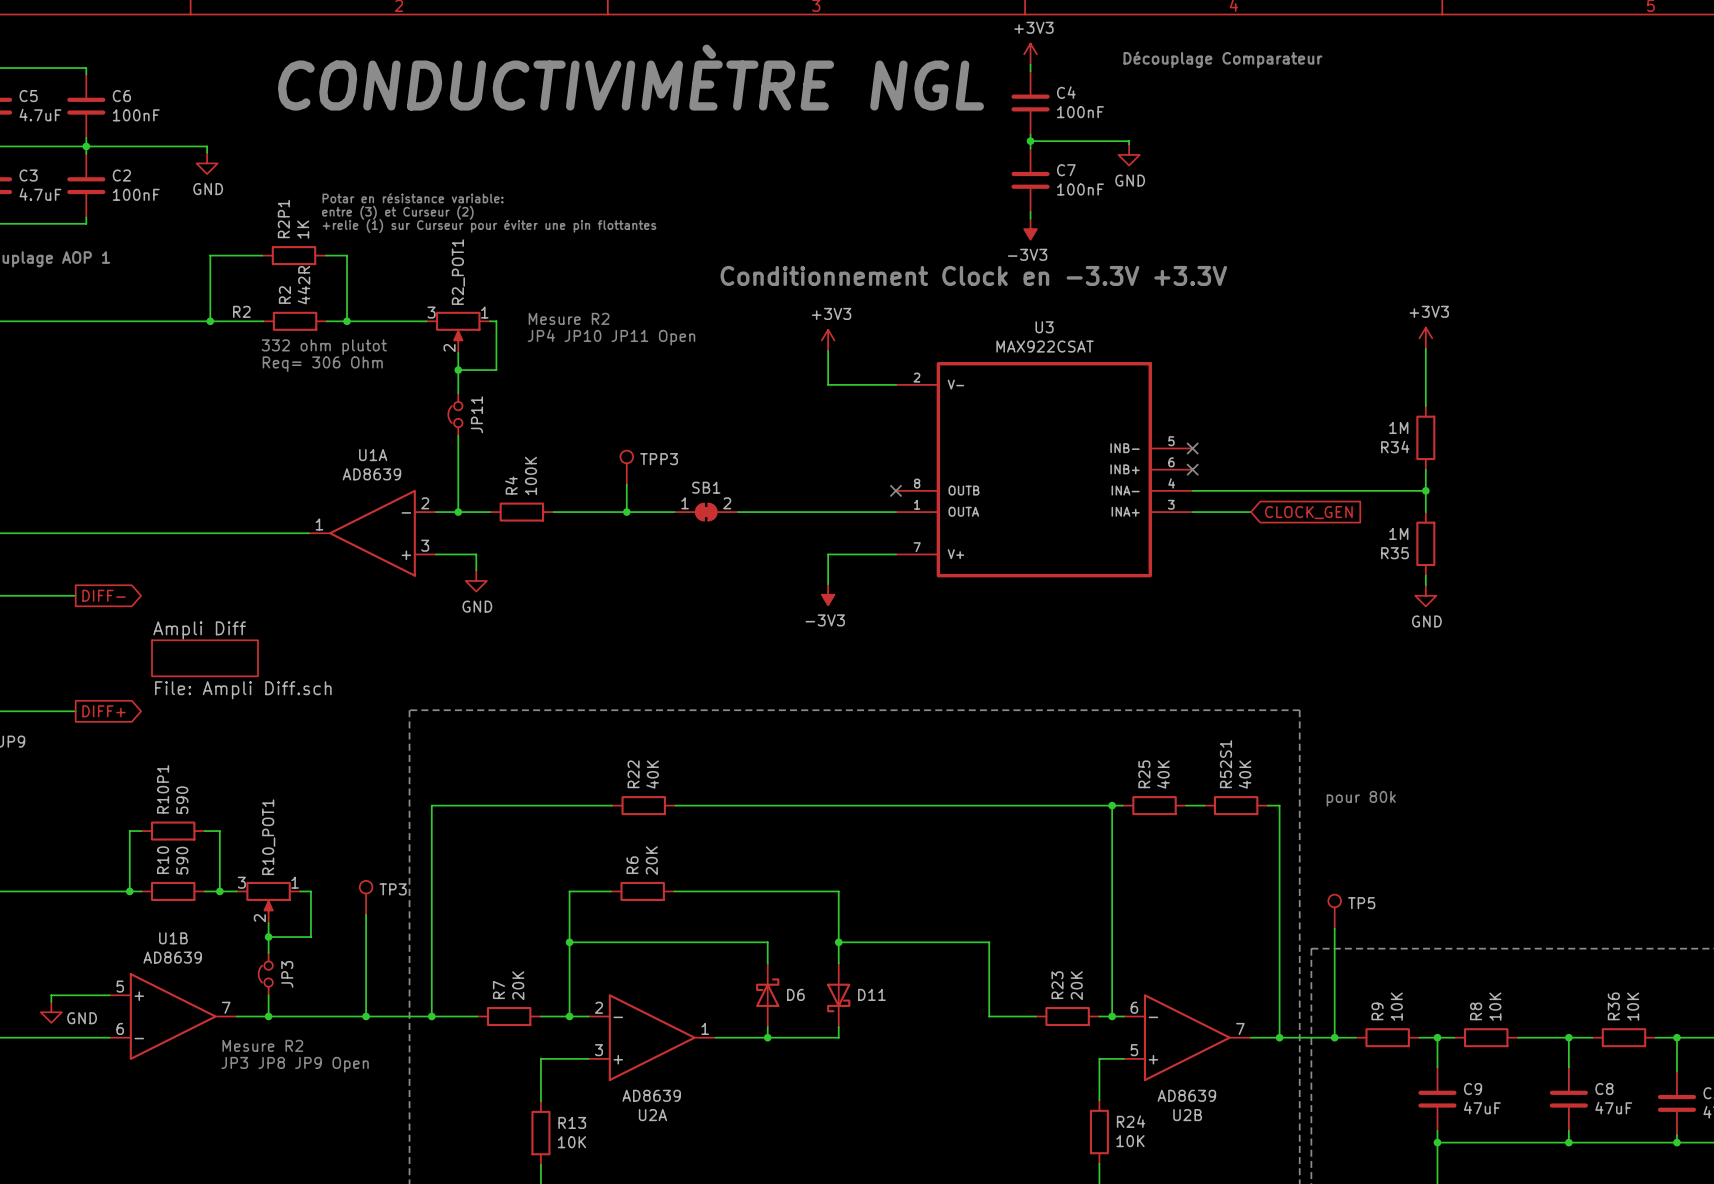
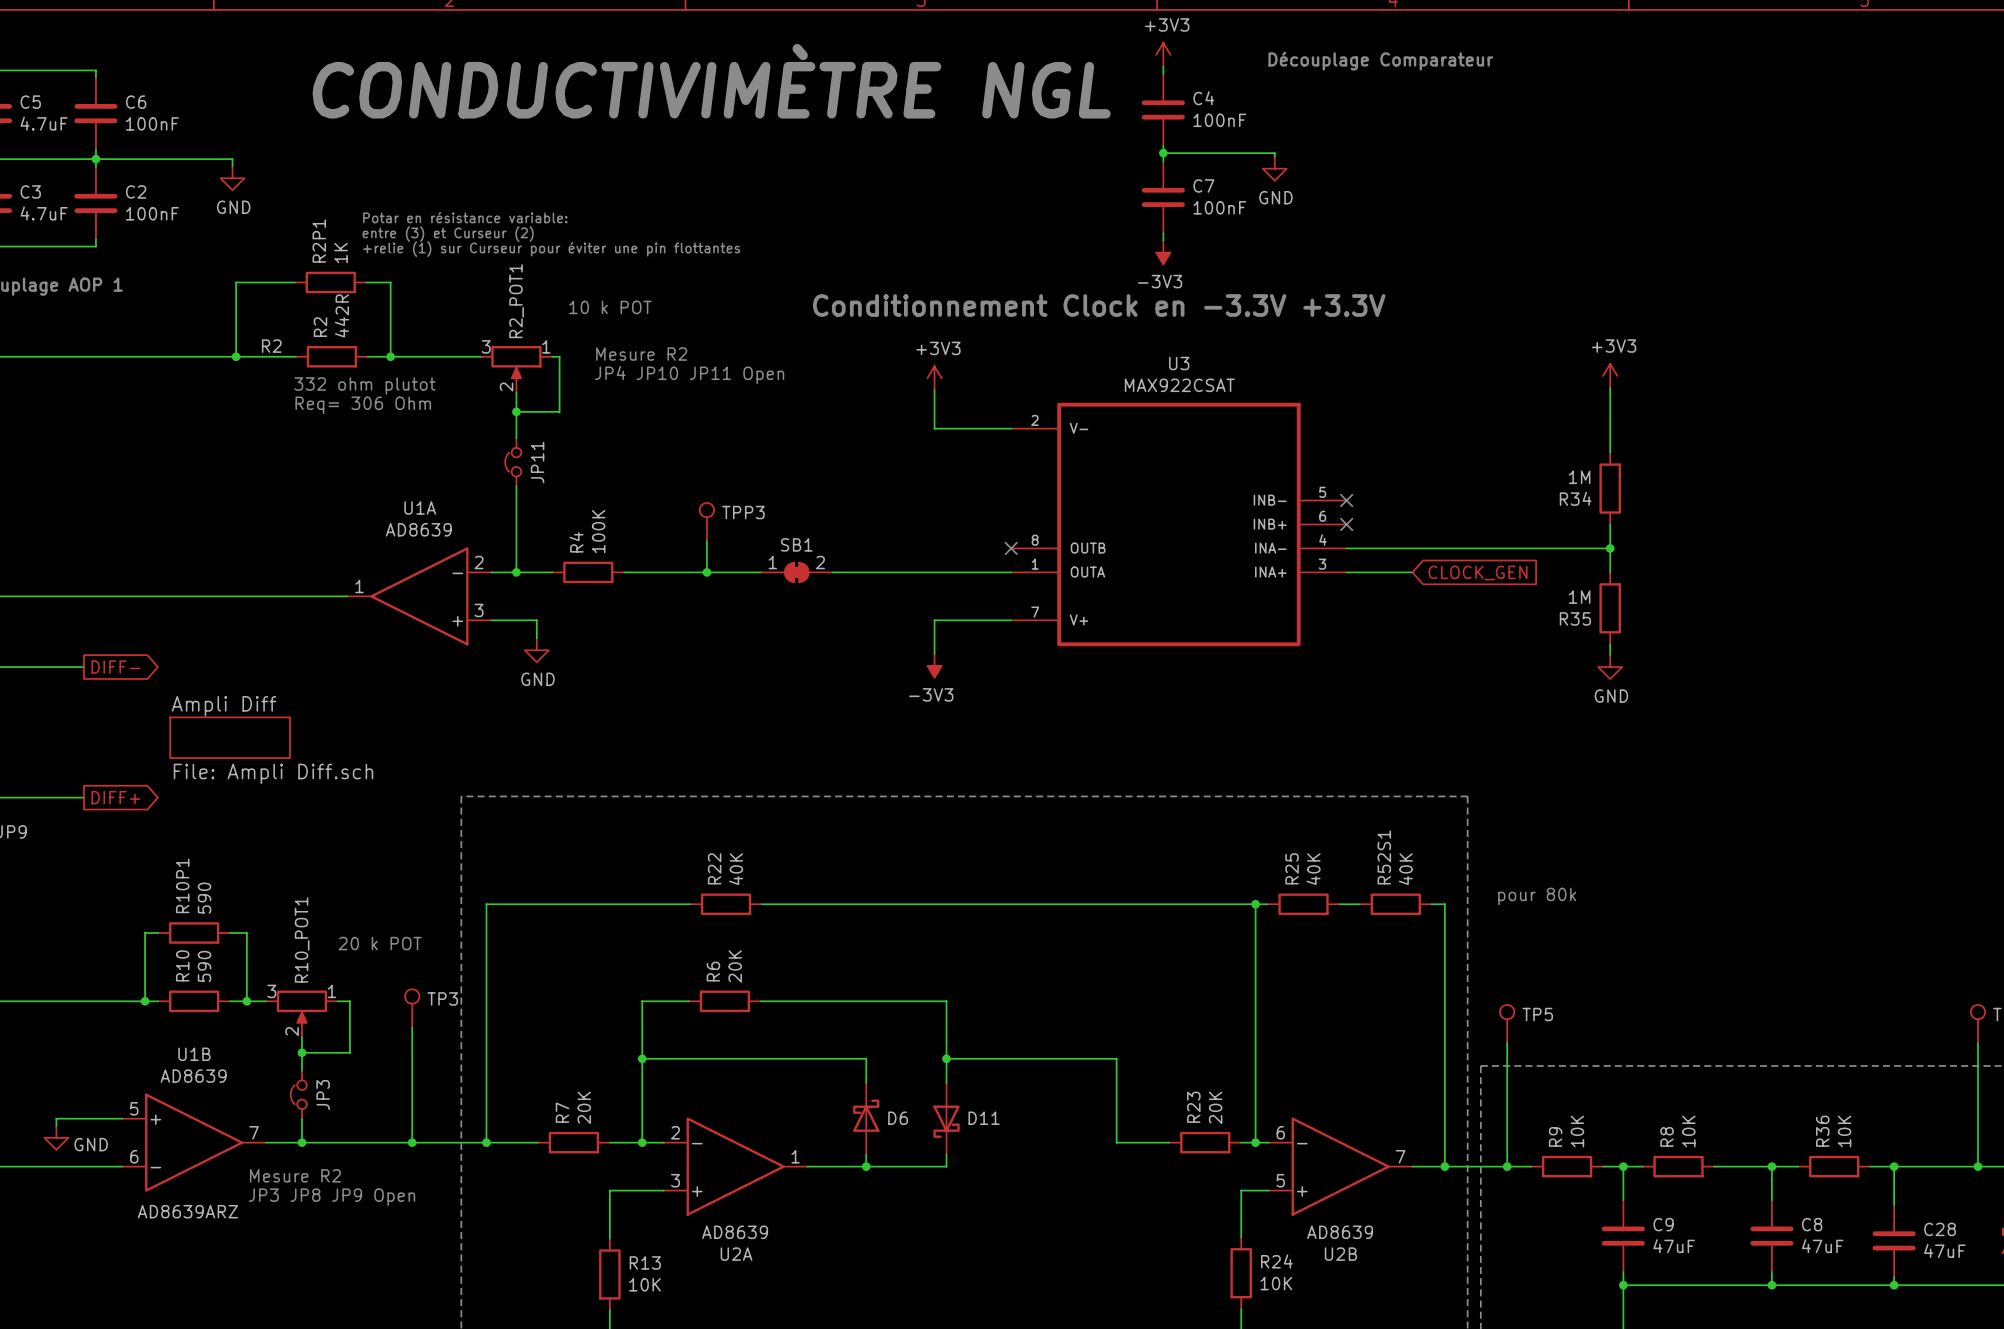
text: none -> 10 k POT (610, 307)
text: none -> 20 k POT (380, 943)
U1B text: none -> AD8639ARZ (187, 1211)

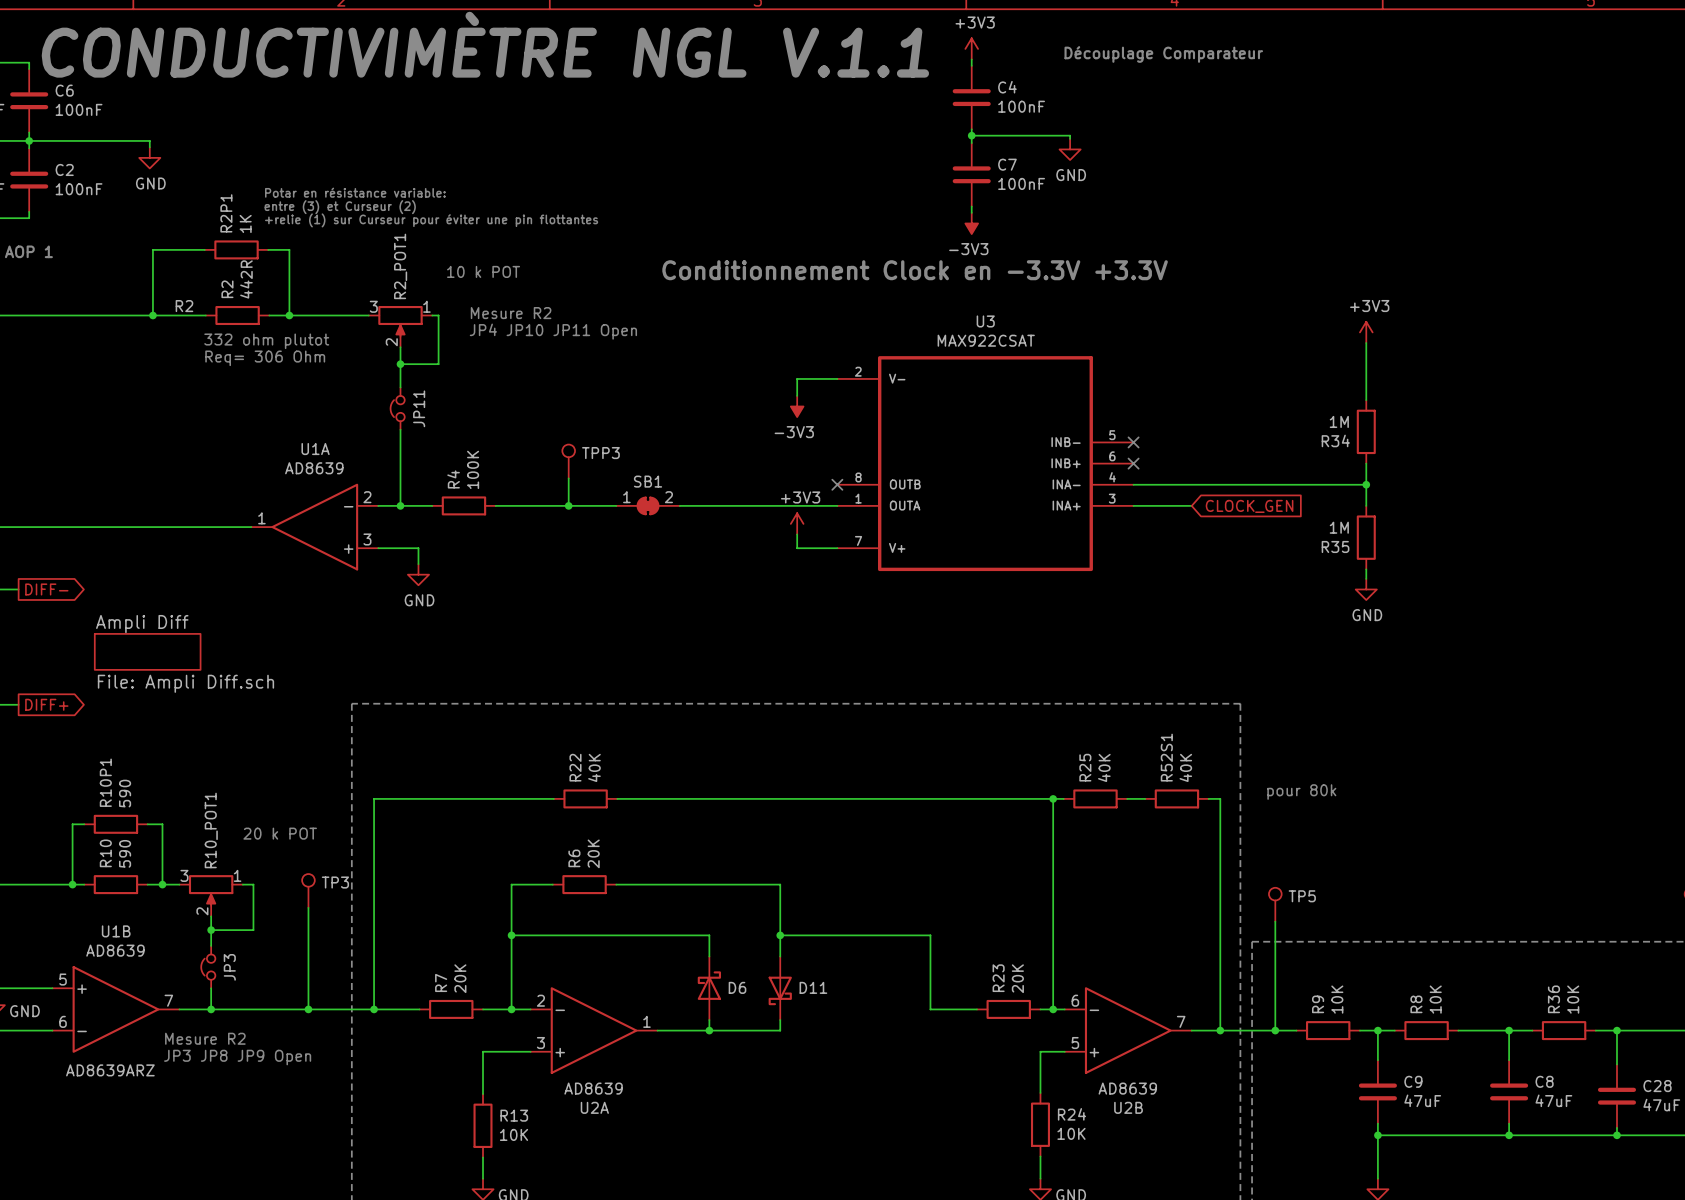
text: CONDUCTIVIMÈTRE NGL (711, 81) -> CONDUCTIVIMÈTRE NGL V.1.1 (485, 44)
power symbol position: +3V3 (934, 378) -> +3V3 (797, 523)
wire: (934, 390) (934, 428) (965, 428) -> (797, 395) (797, 378)
wire: (965, 620) (934, 620) (934, 653) -> (797, 548) (797, 534)
power symbol position: -3V3 (934, 665) -> -3V3 (797, 406)

